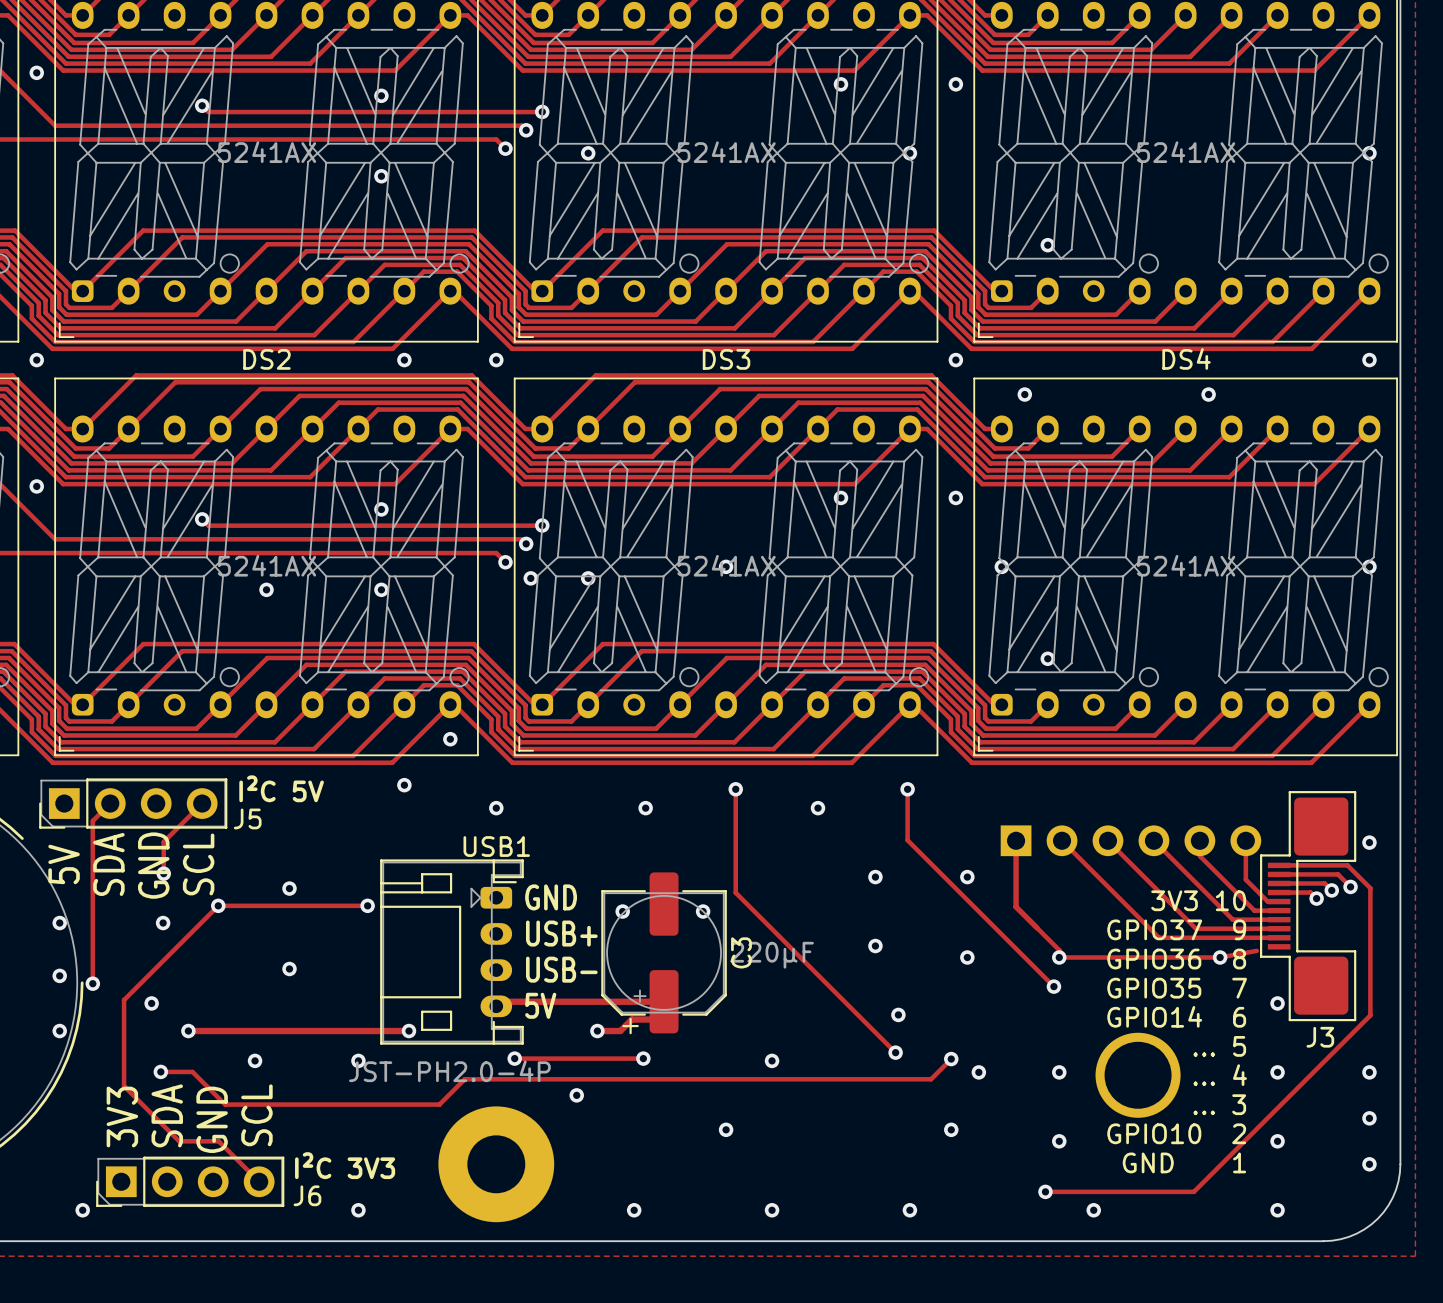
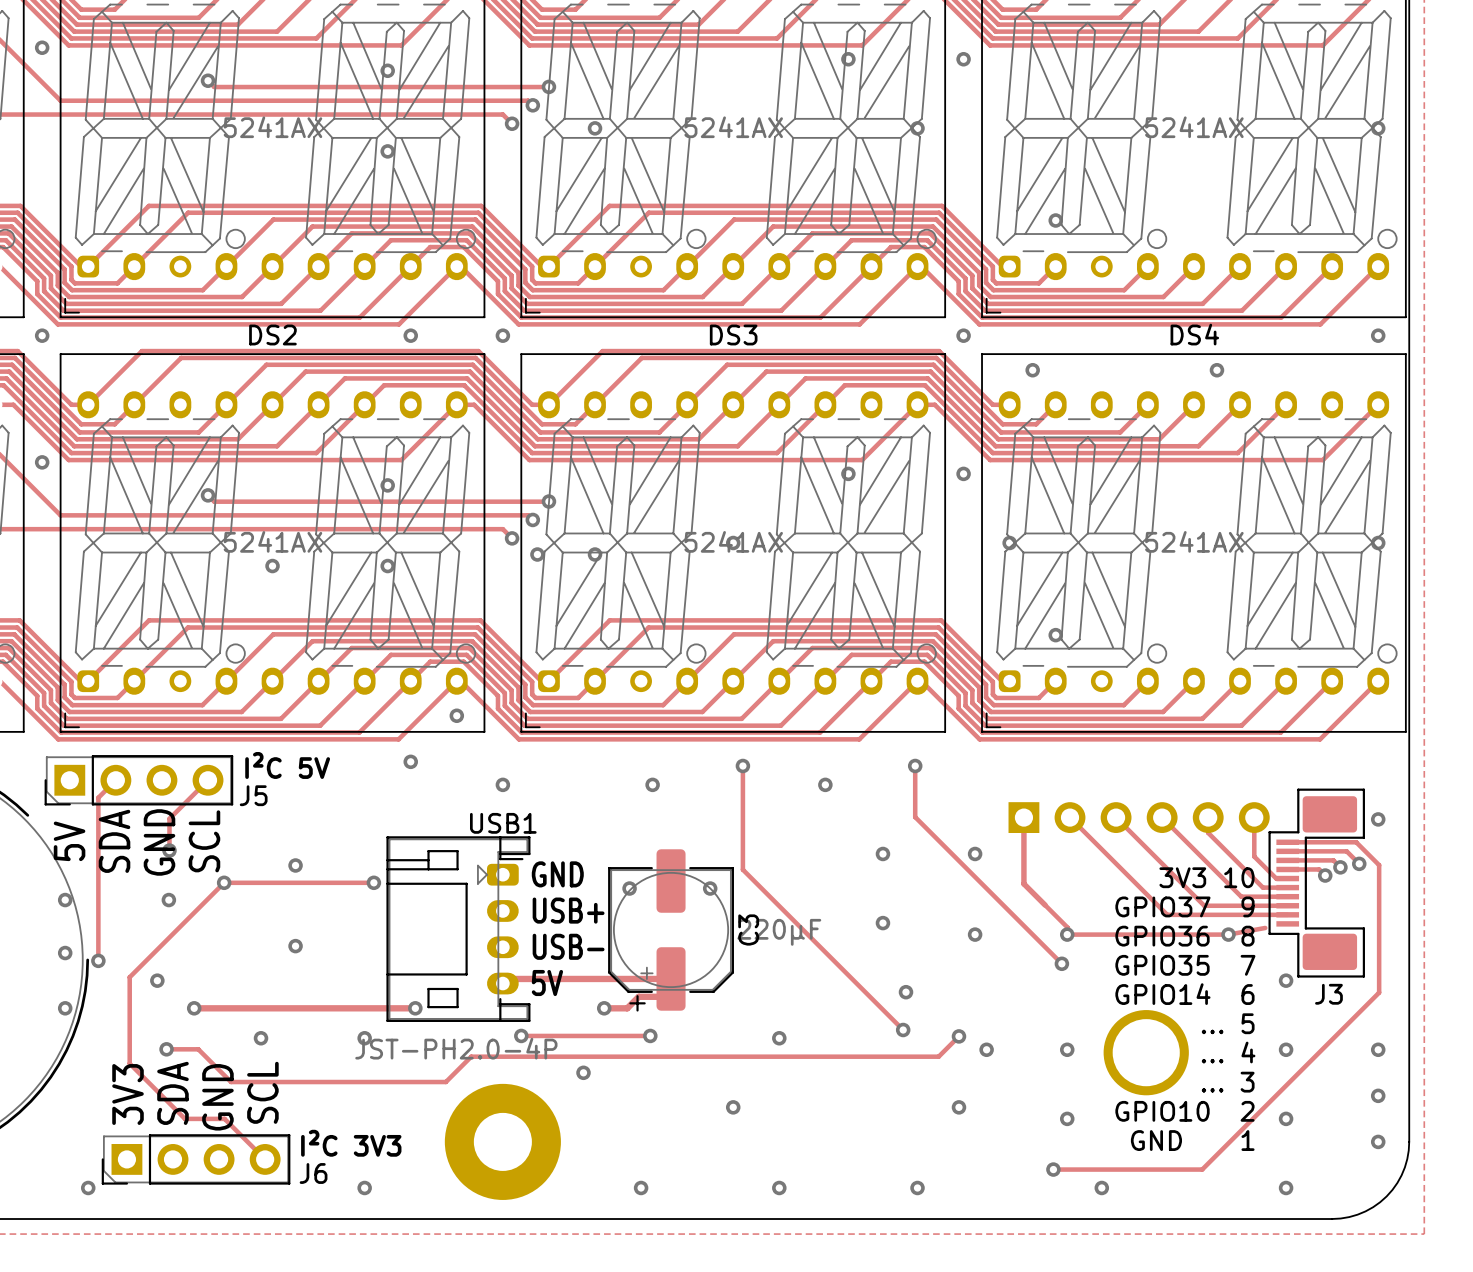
J3 footprint: [1260, 791, 1357, 1022] -> [1268, 788, 1365, 978]

